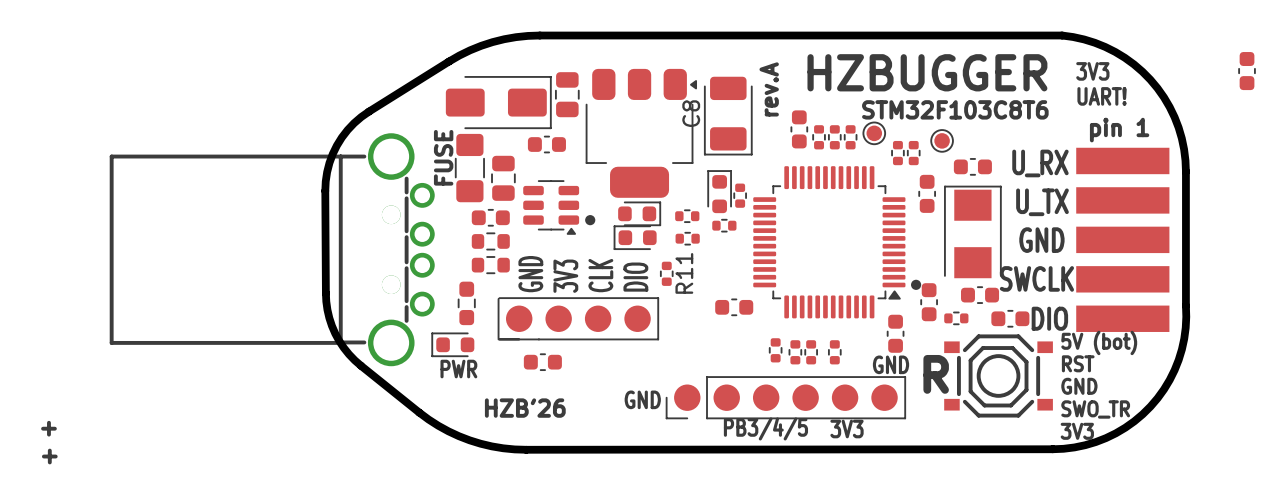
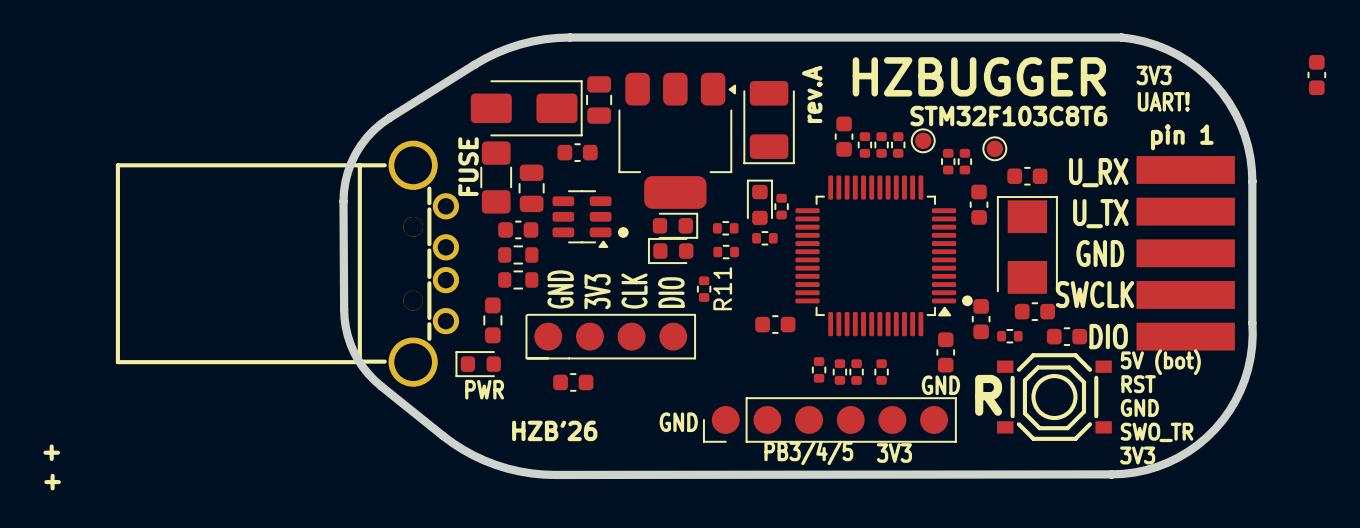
C8 name: C8 (691, 113) -> none

